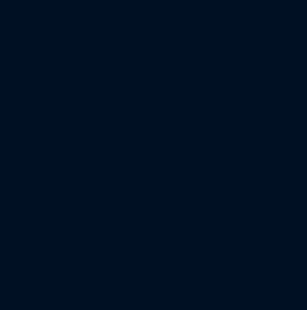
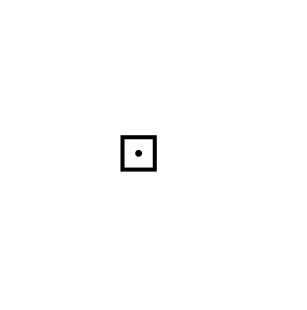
text: none -> ⚀ (138, 153)

